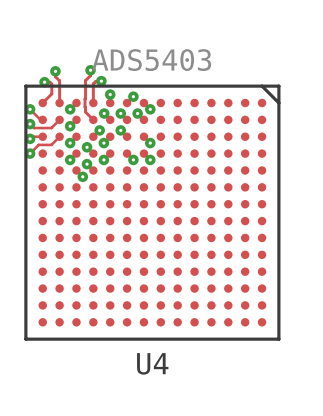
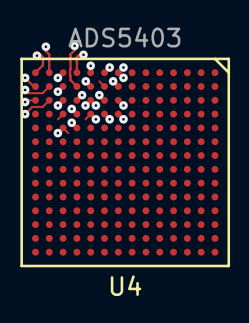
via: none -> (123, 67)
via: (120, 113) -> none
via: none -> (95, 105)
via: (70, 159) -> none
via: (103, 159) -> none
via: none -> (95, 119)
via: none -> (57, 133)
via: (82, 176) -> none

